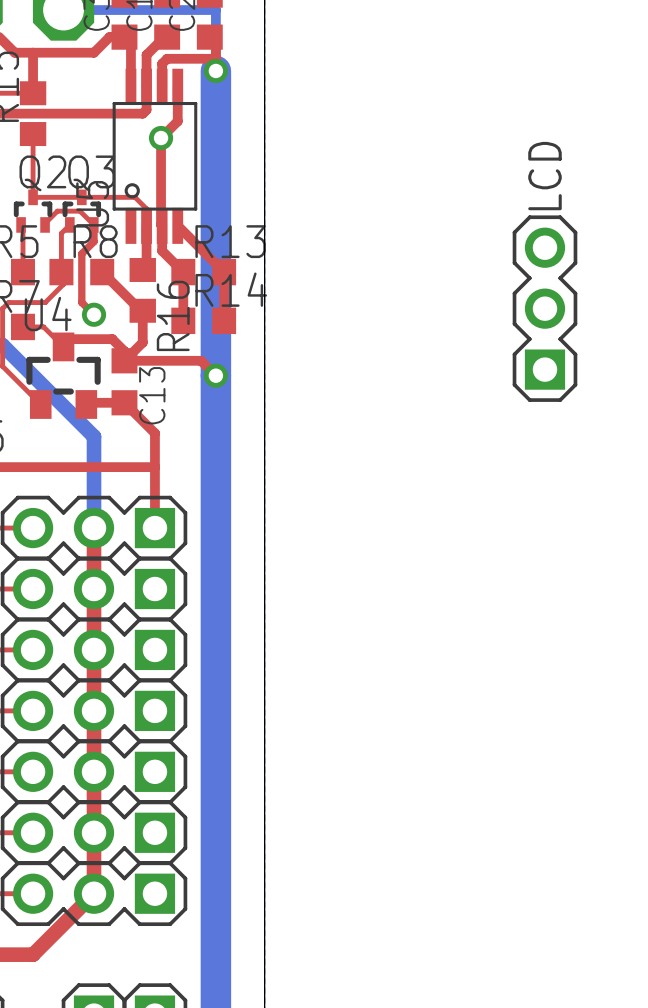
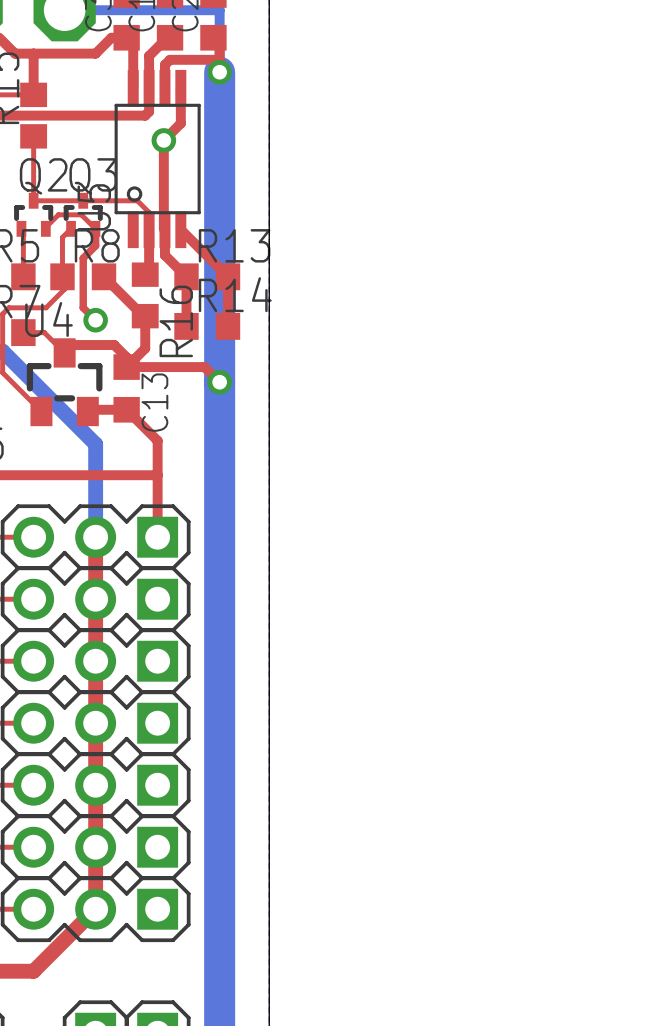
part: LCD (544, 308) -> none

